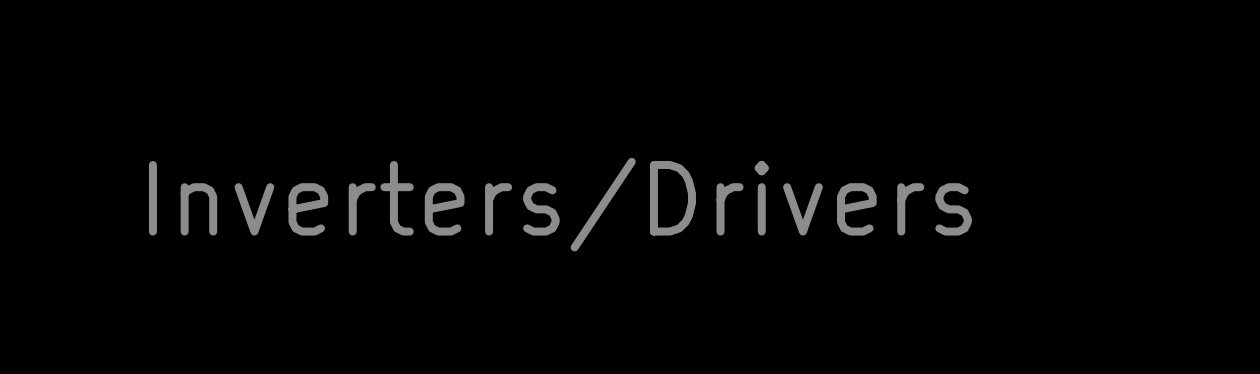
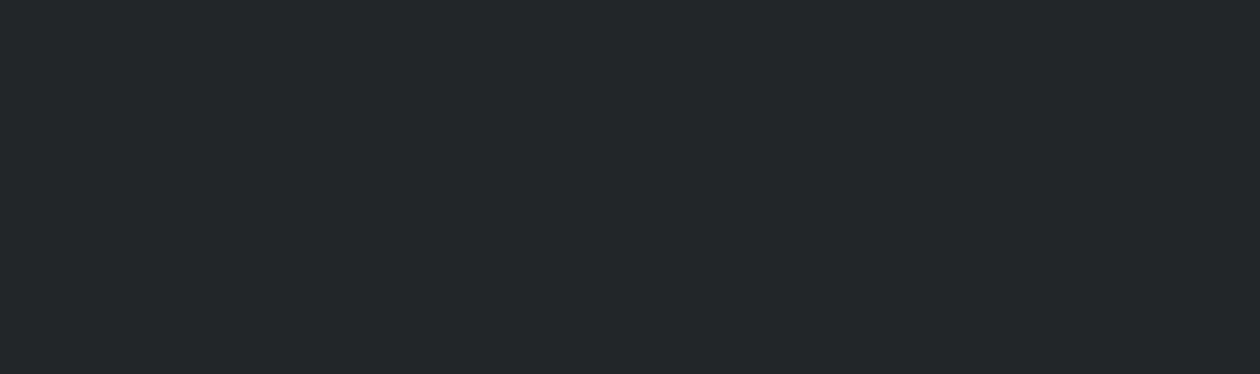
text: Inverters/Drivers (560, 204) -> none

